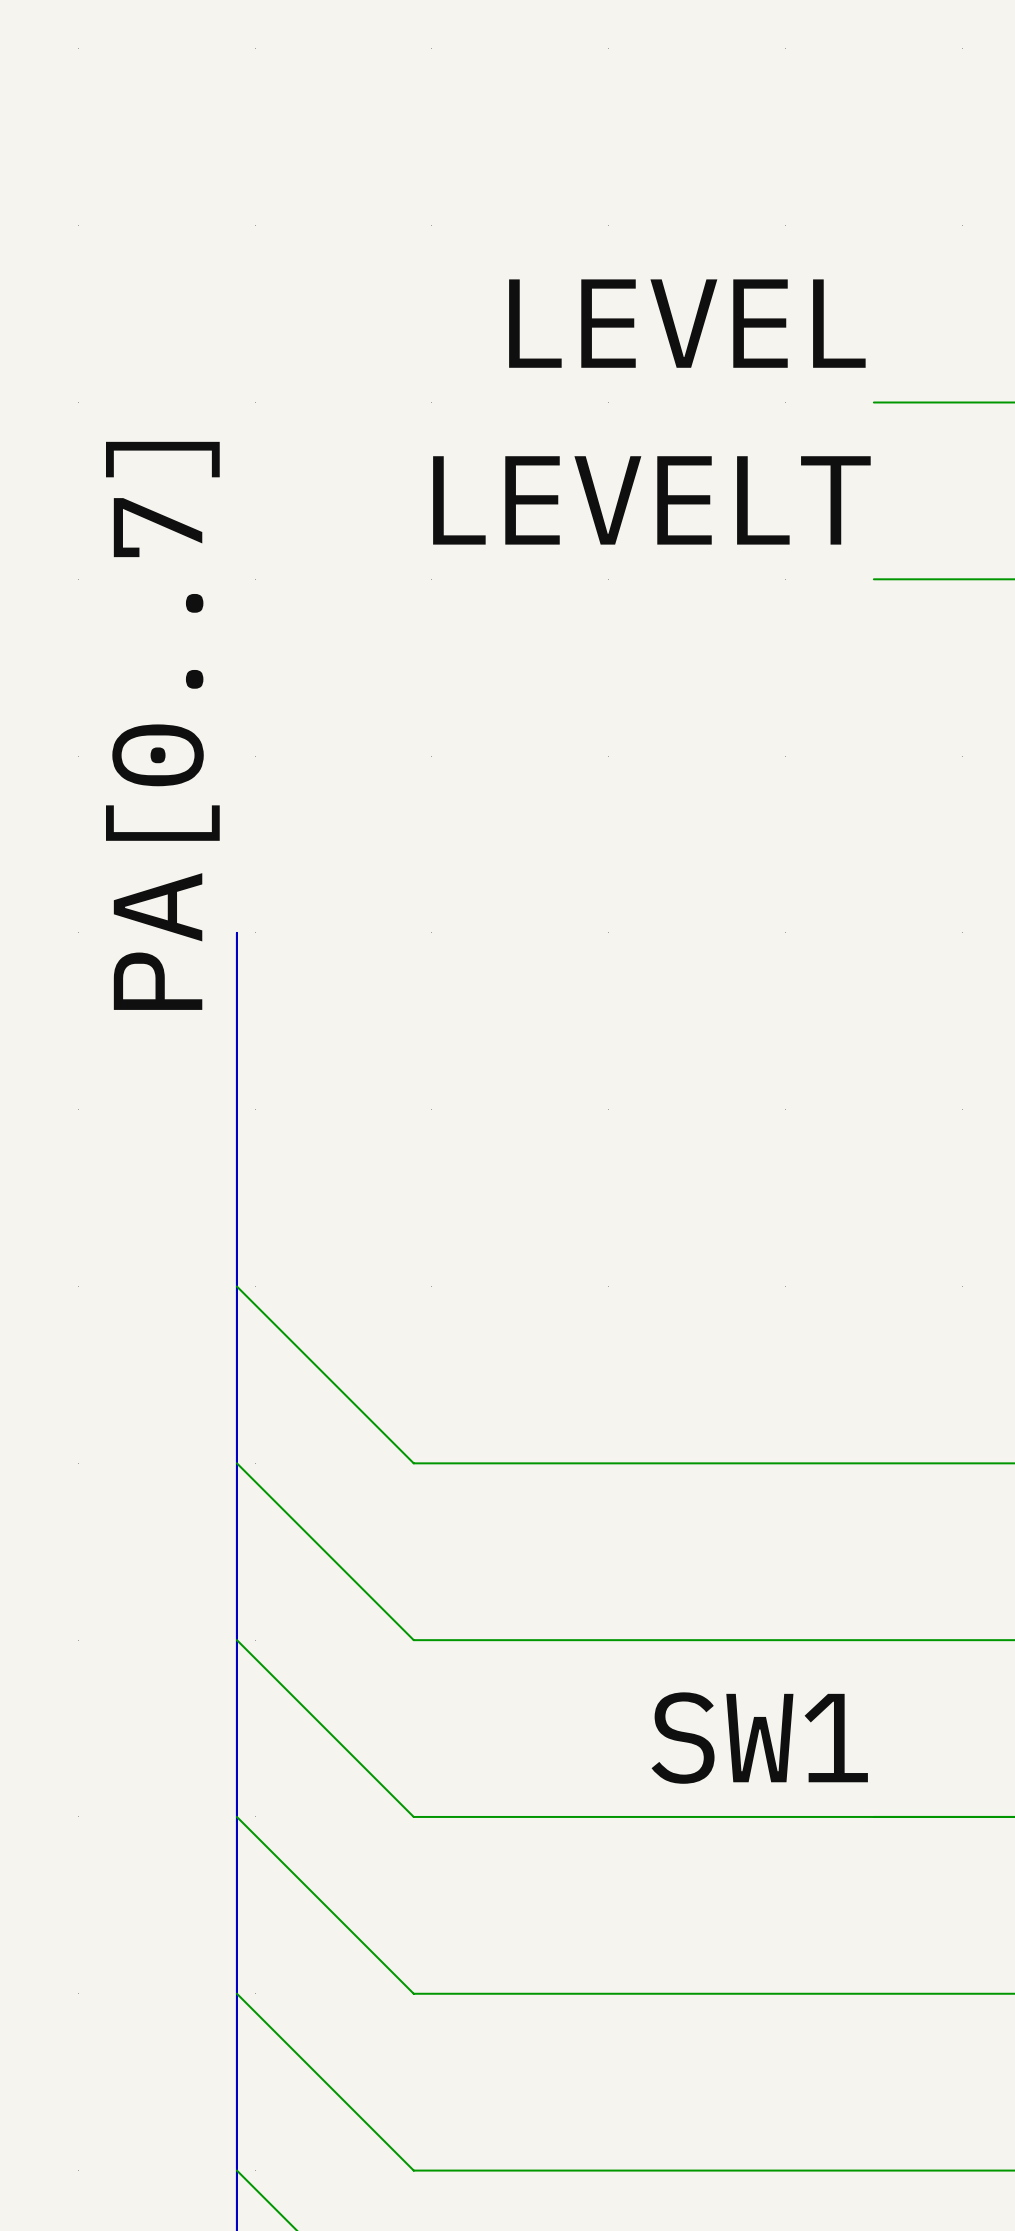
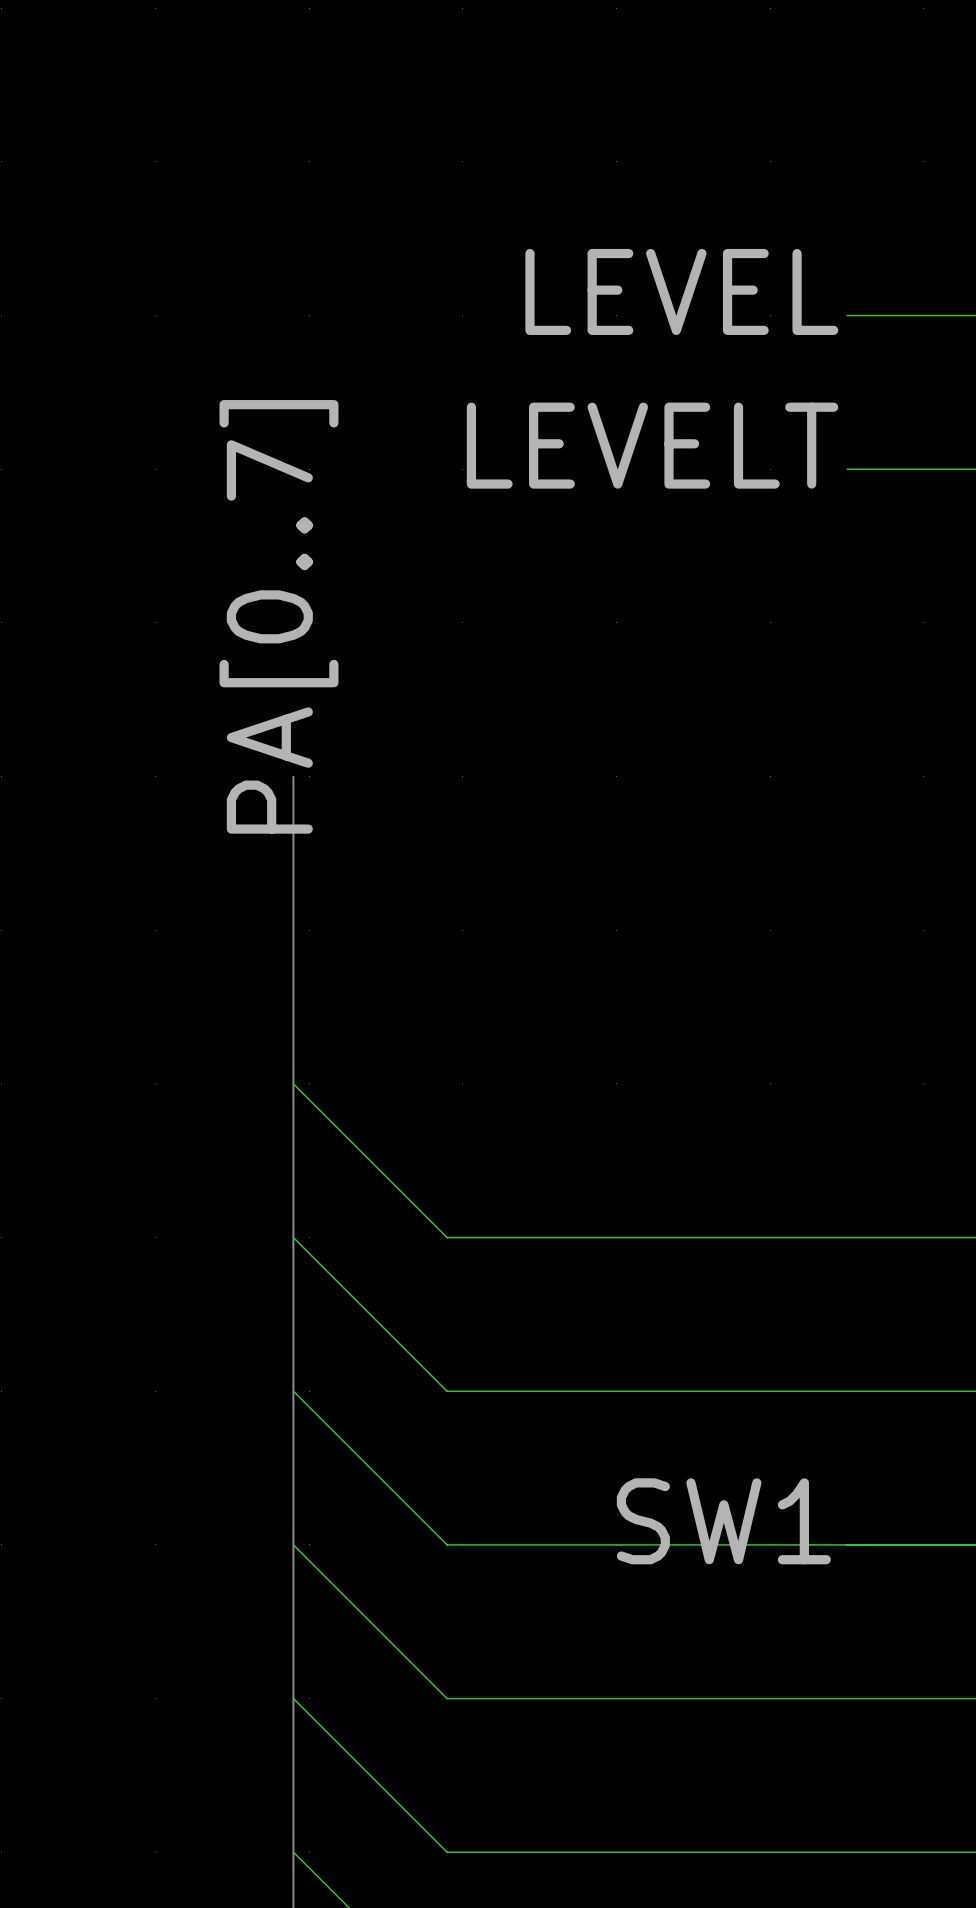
label position: LEVEL (687, 323) -> LEVEL (681, 291)
label position: LEVELT (651, 500) -> LEVELT (652, 445)
label position: PA[0..7] (162, 725) -> PA[0..7] (278, 616)
label position: SW1 (759, 1738) -> SW1 (723, 1521)

